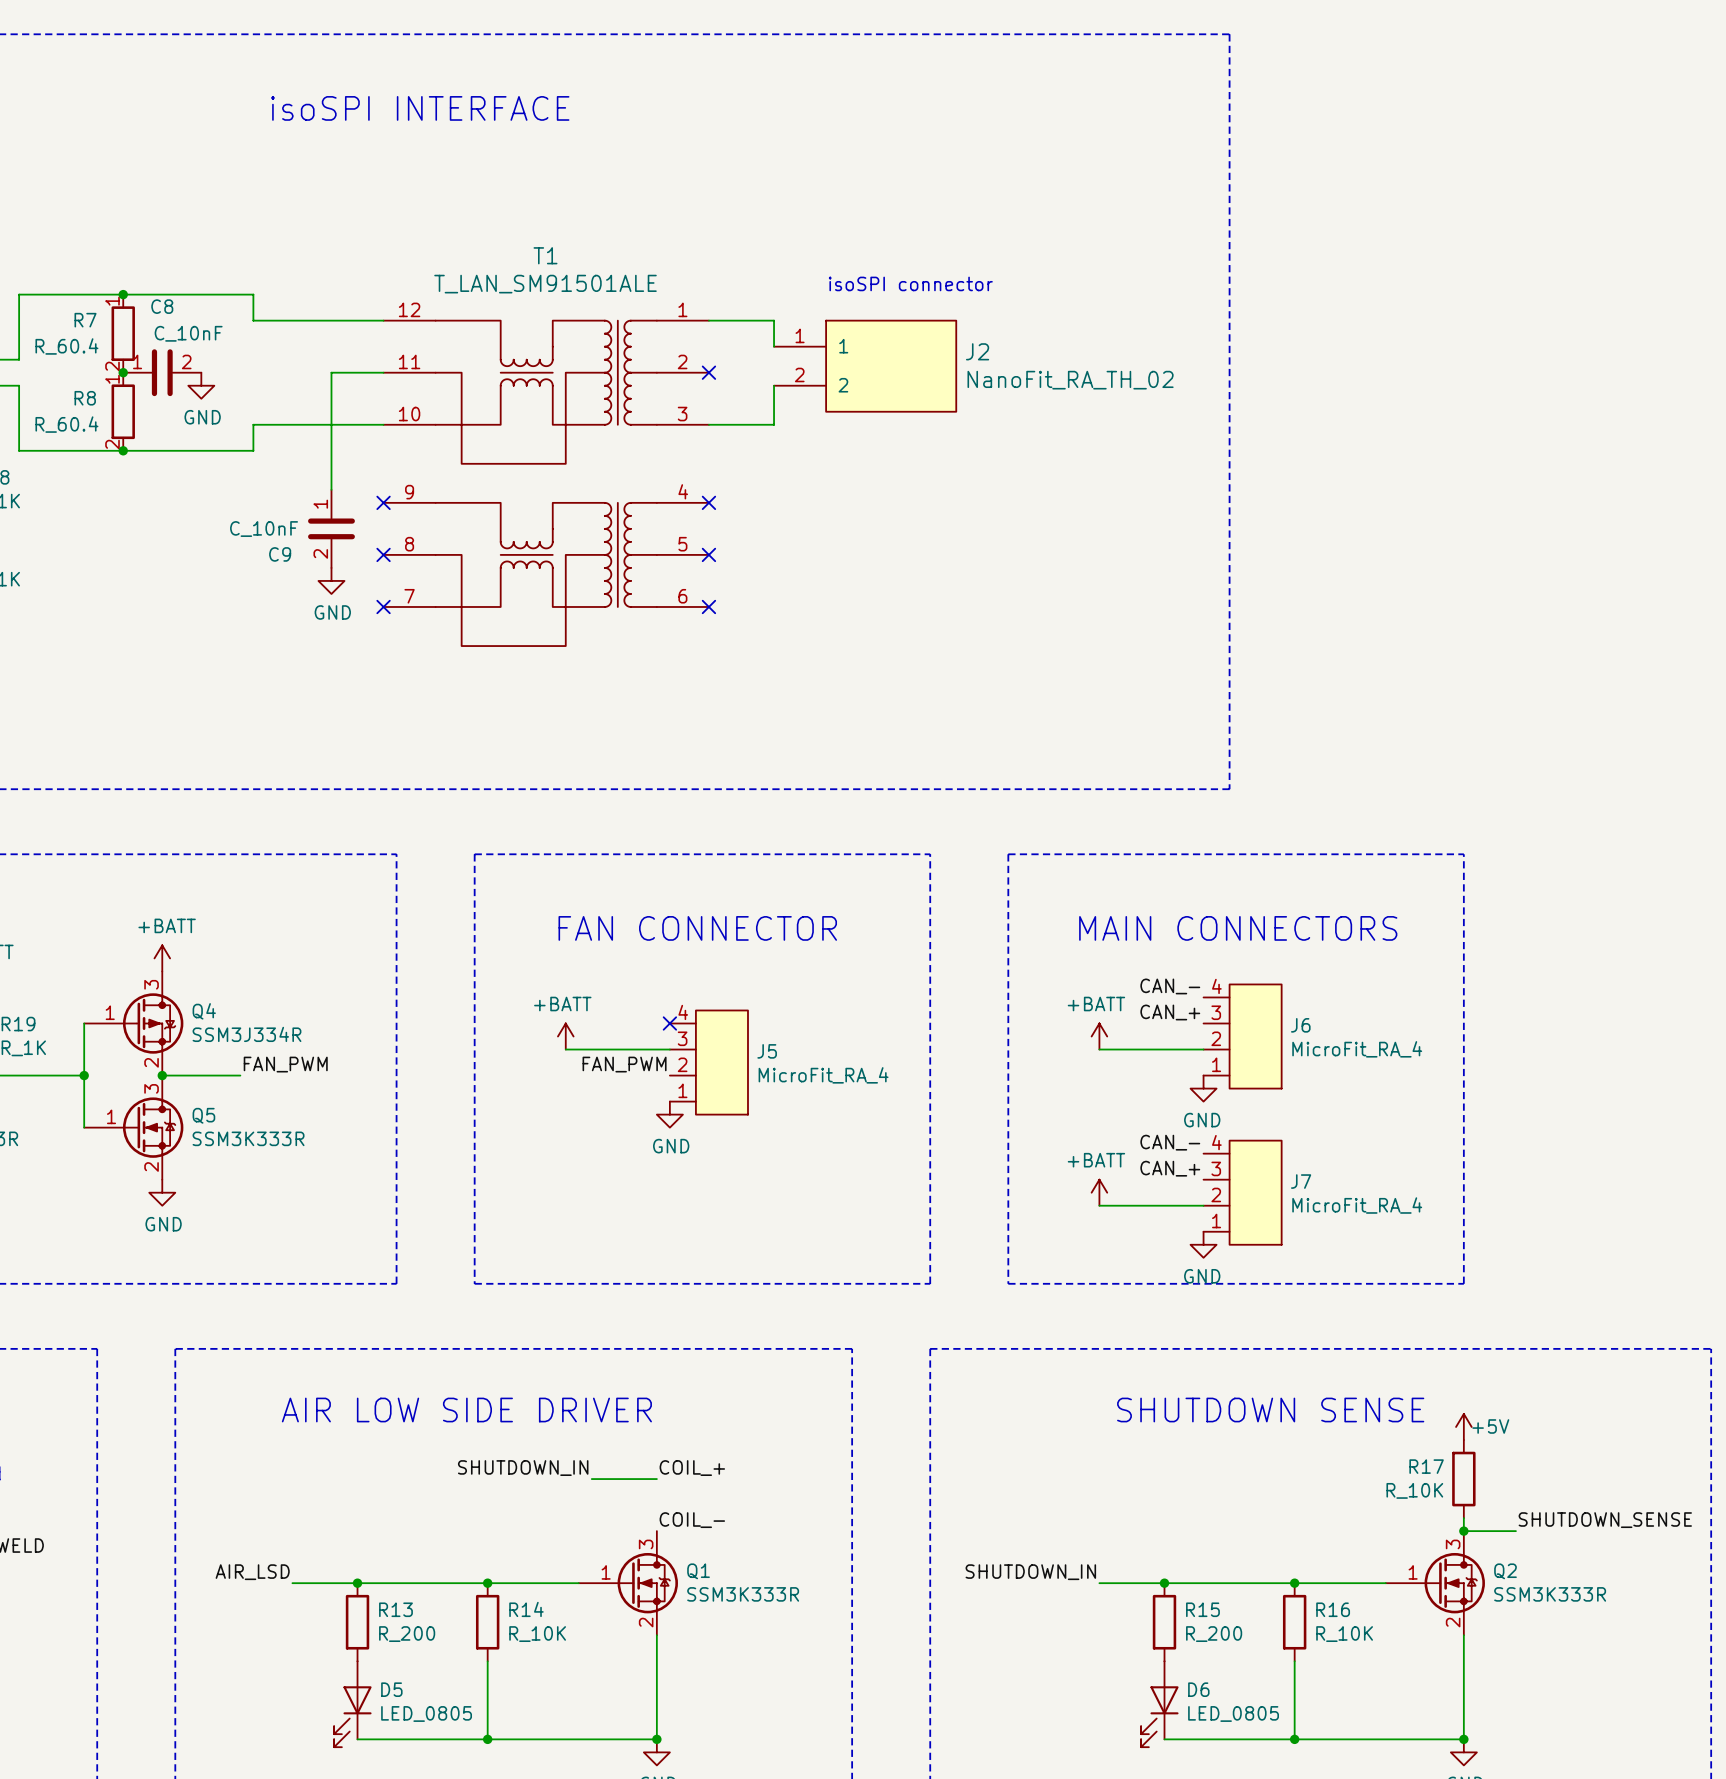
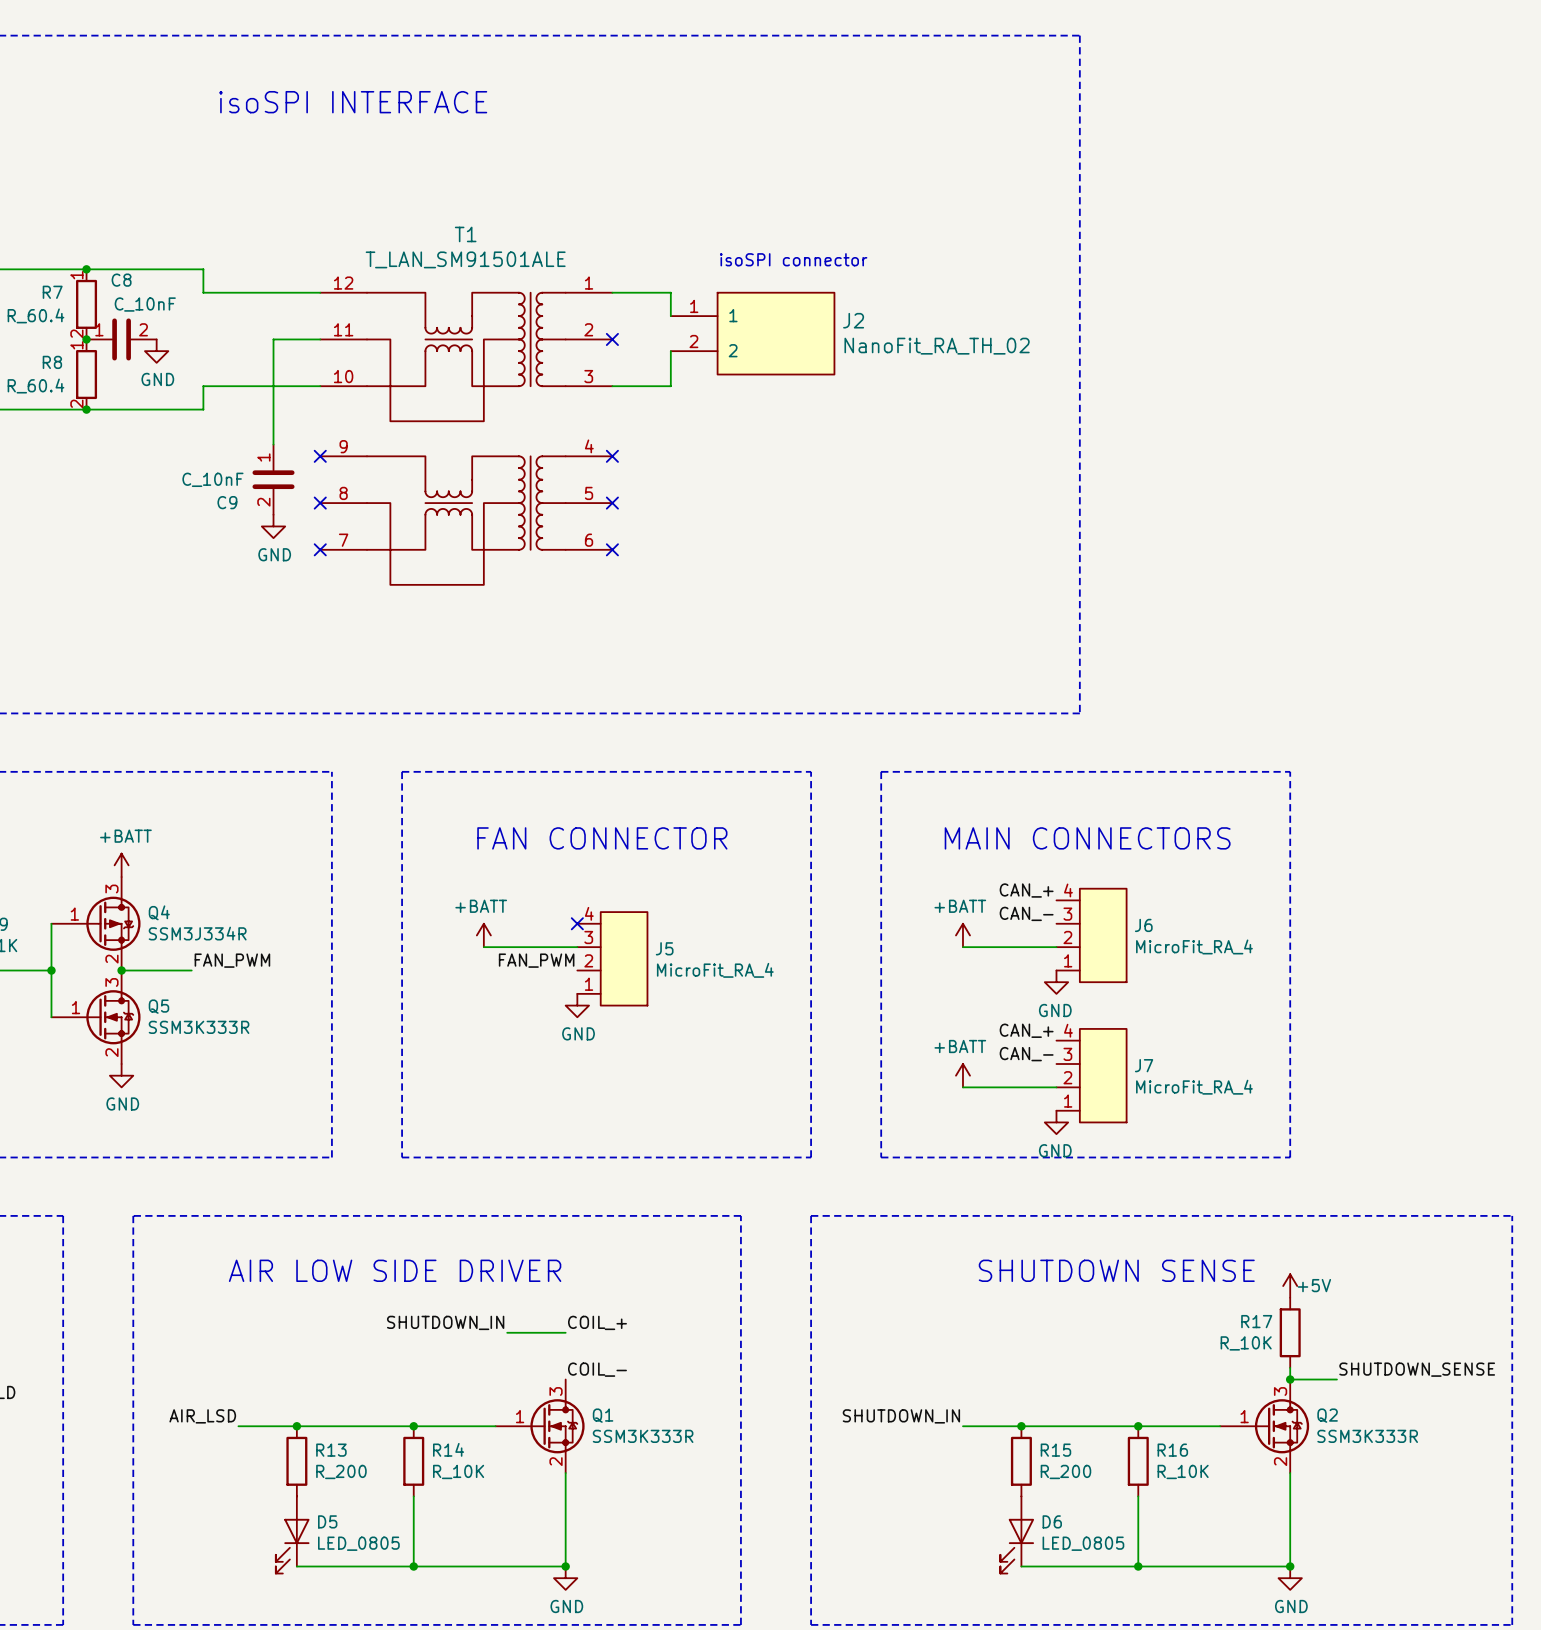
label: CAN_- (1170, 986) -> CAN_+ (1026, 890)
label: CAN_+ (1170, 1012) -> CAN_- (1026, 913)
label: CAN_- (1170, 1142) -> CAN_+ (1026, 1030)
label: CAN_+ (1170, 1168) -> CAN_- (1026, 1054)

